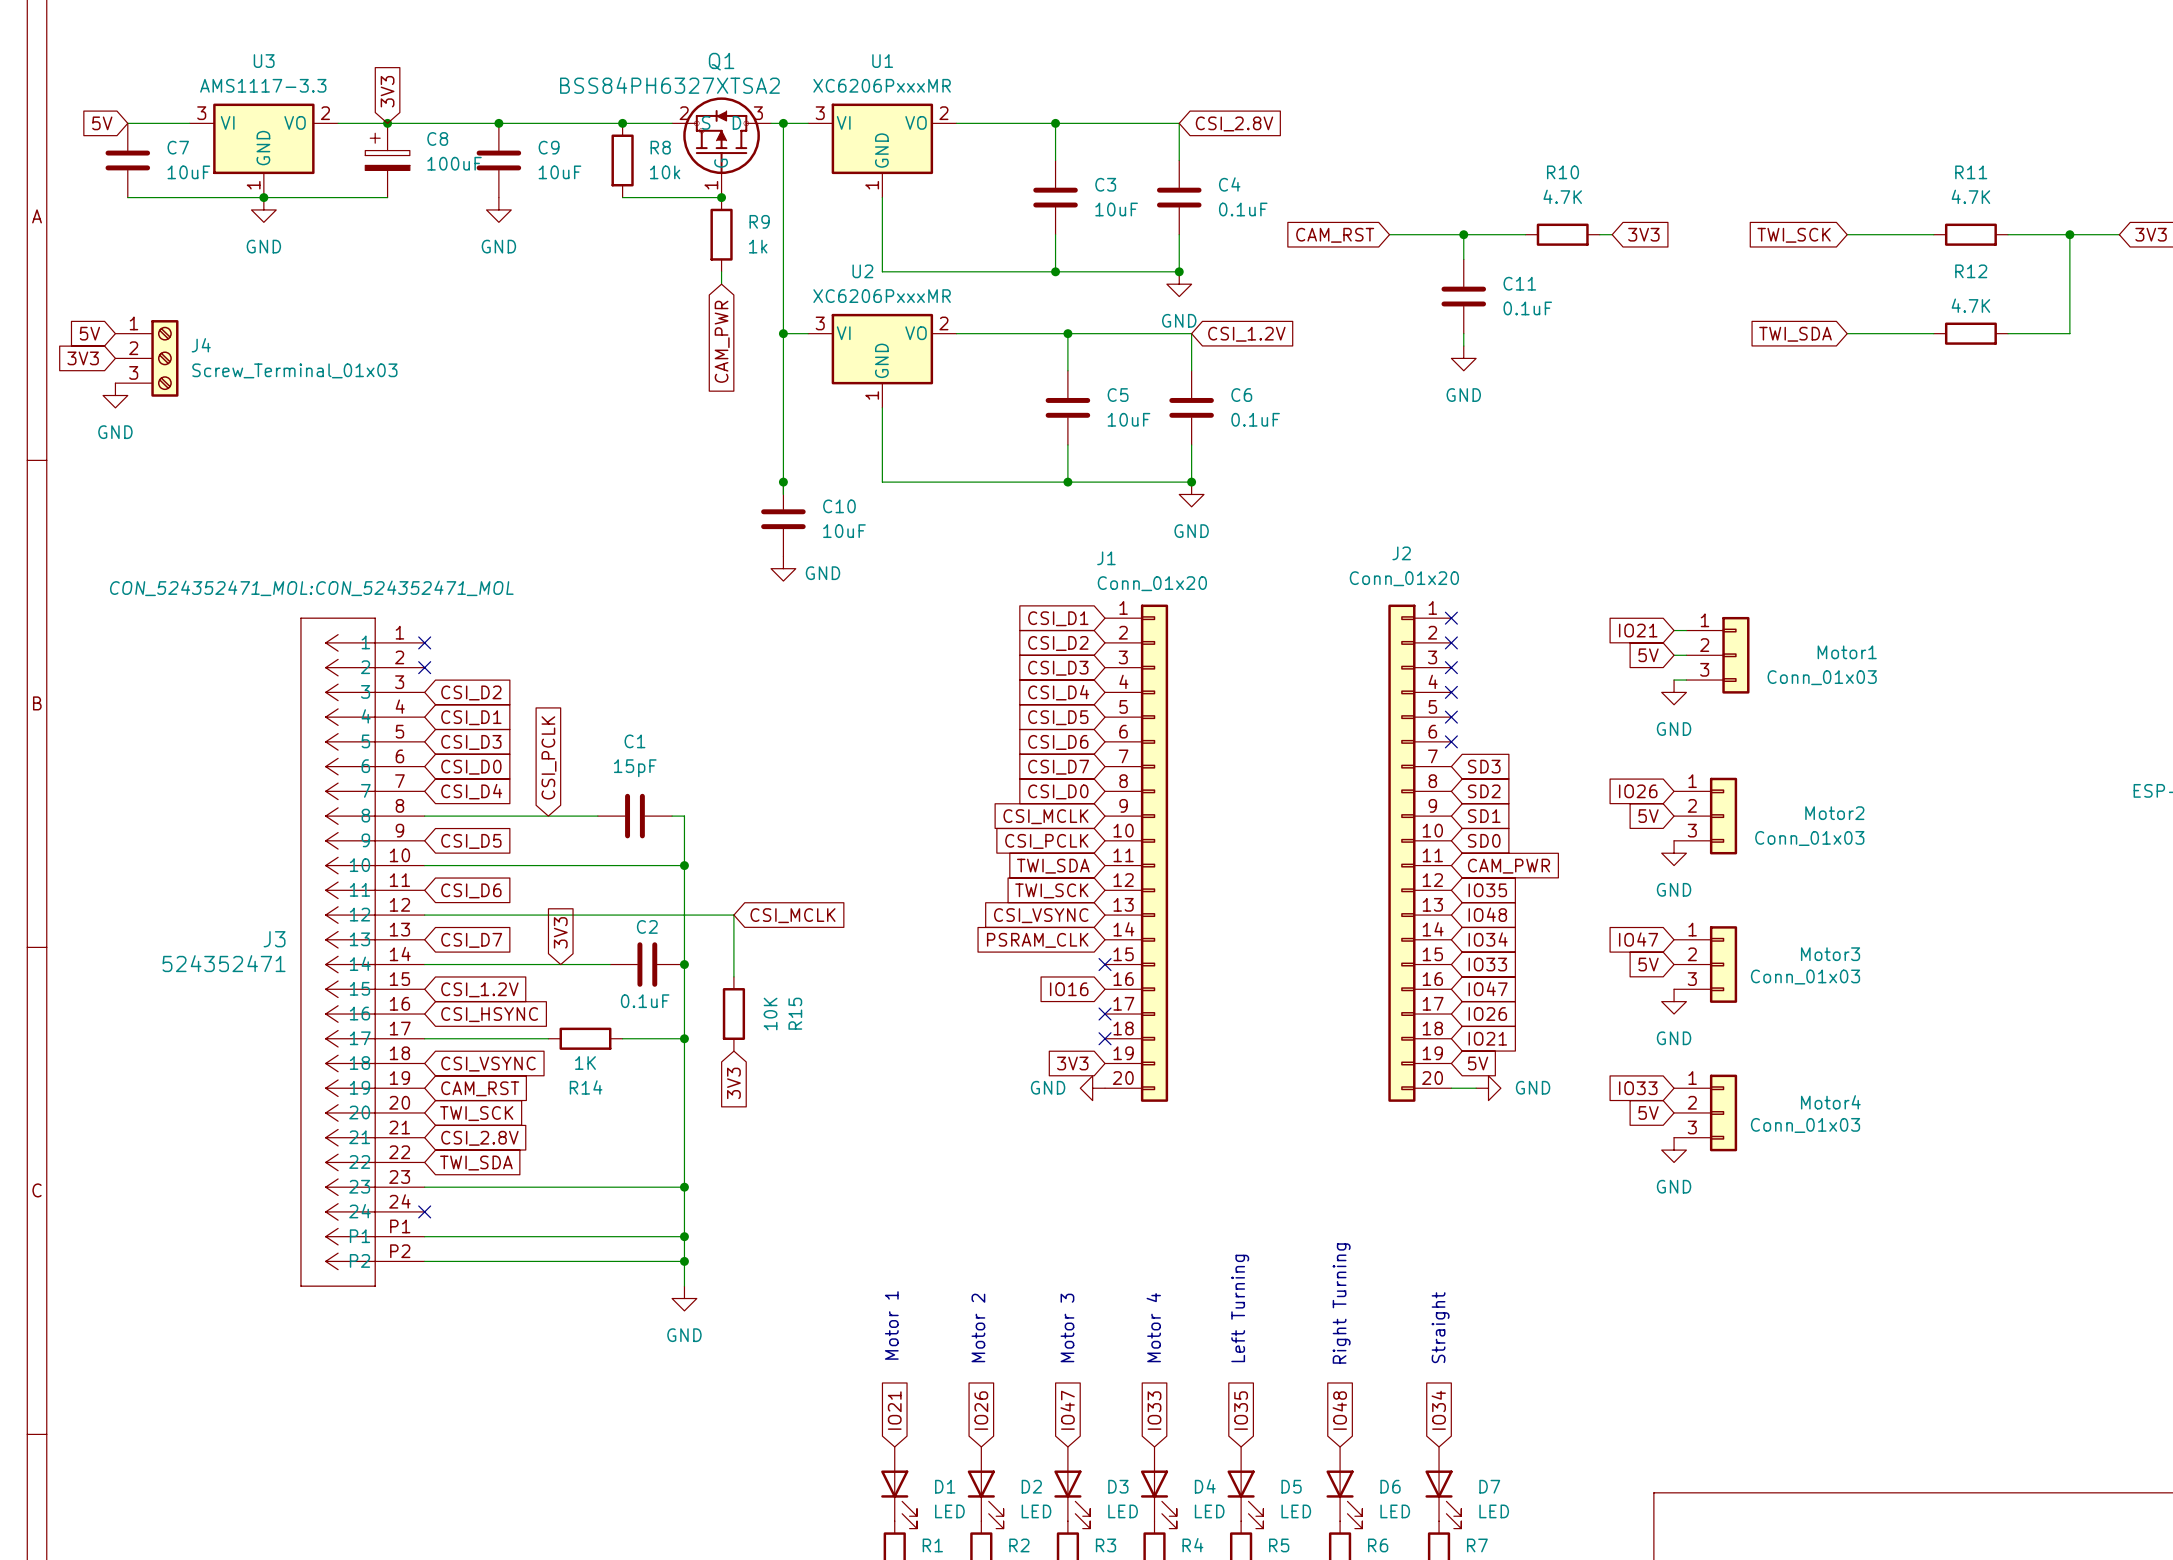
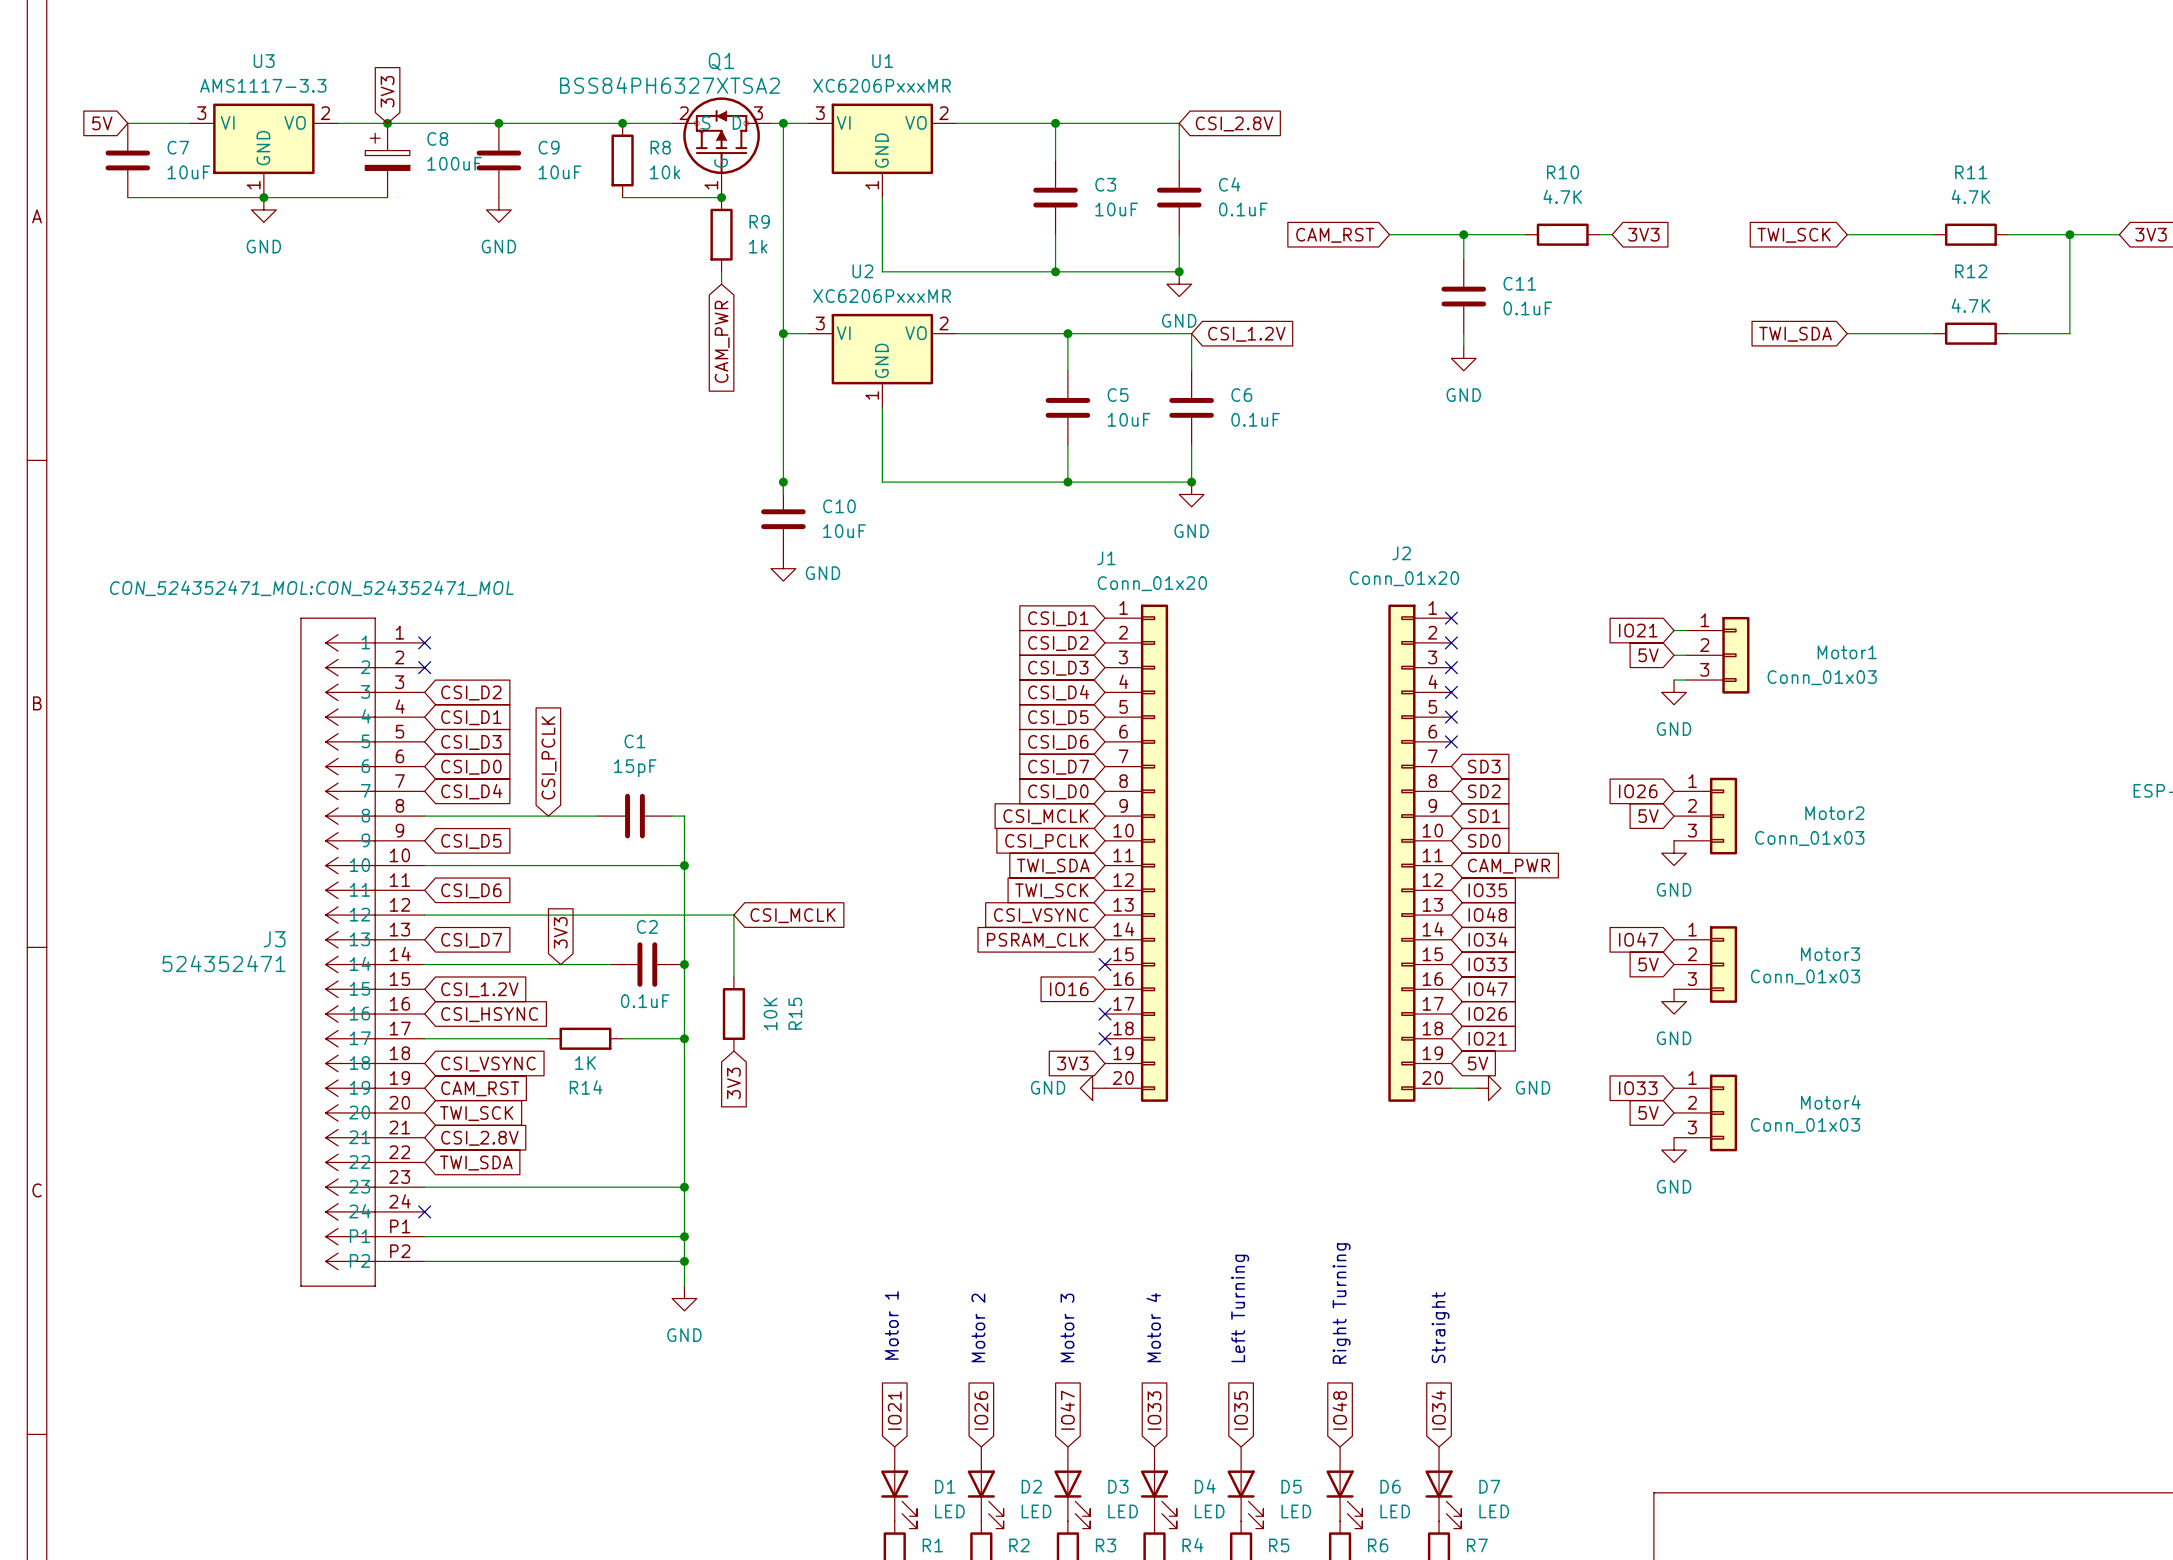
global label: 5V (89, 333) -> none
global label: 3V3 (83, 358) -> none
J4: Screw_Terminal_01x03 (146, 358) -> none
power symbol: GND (115, 395) -> none

